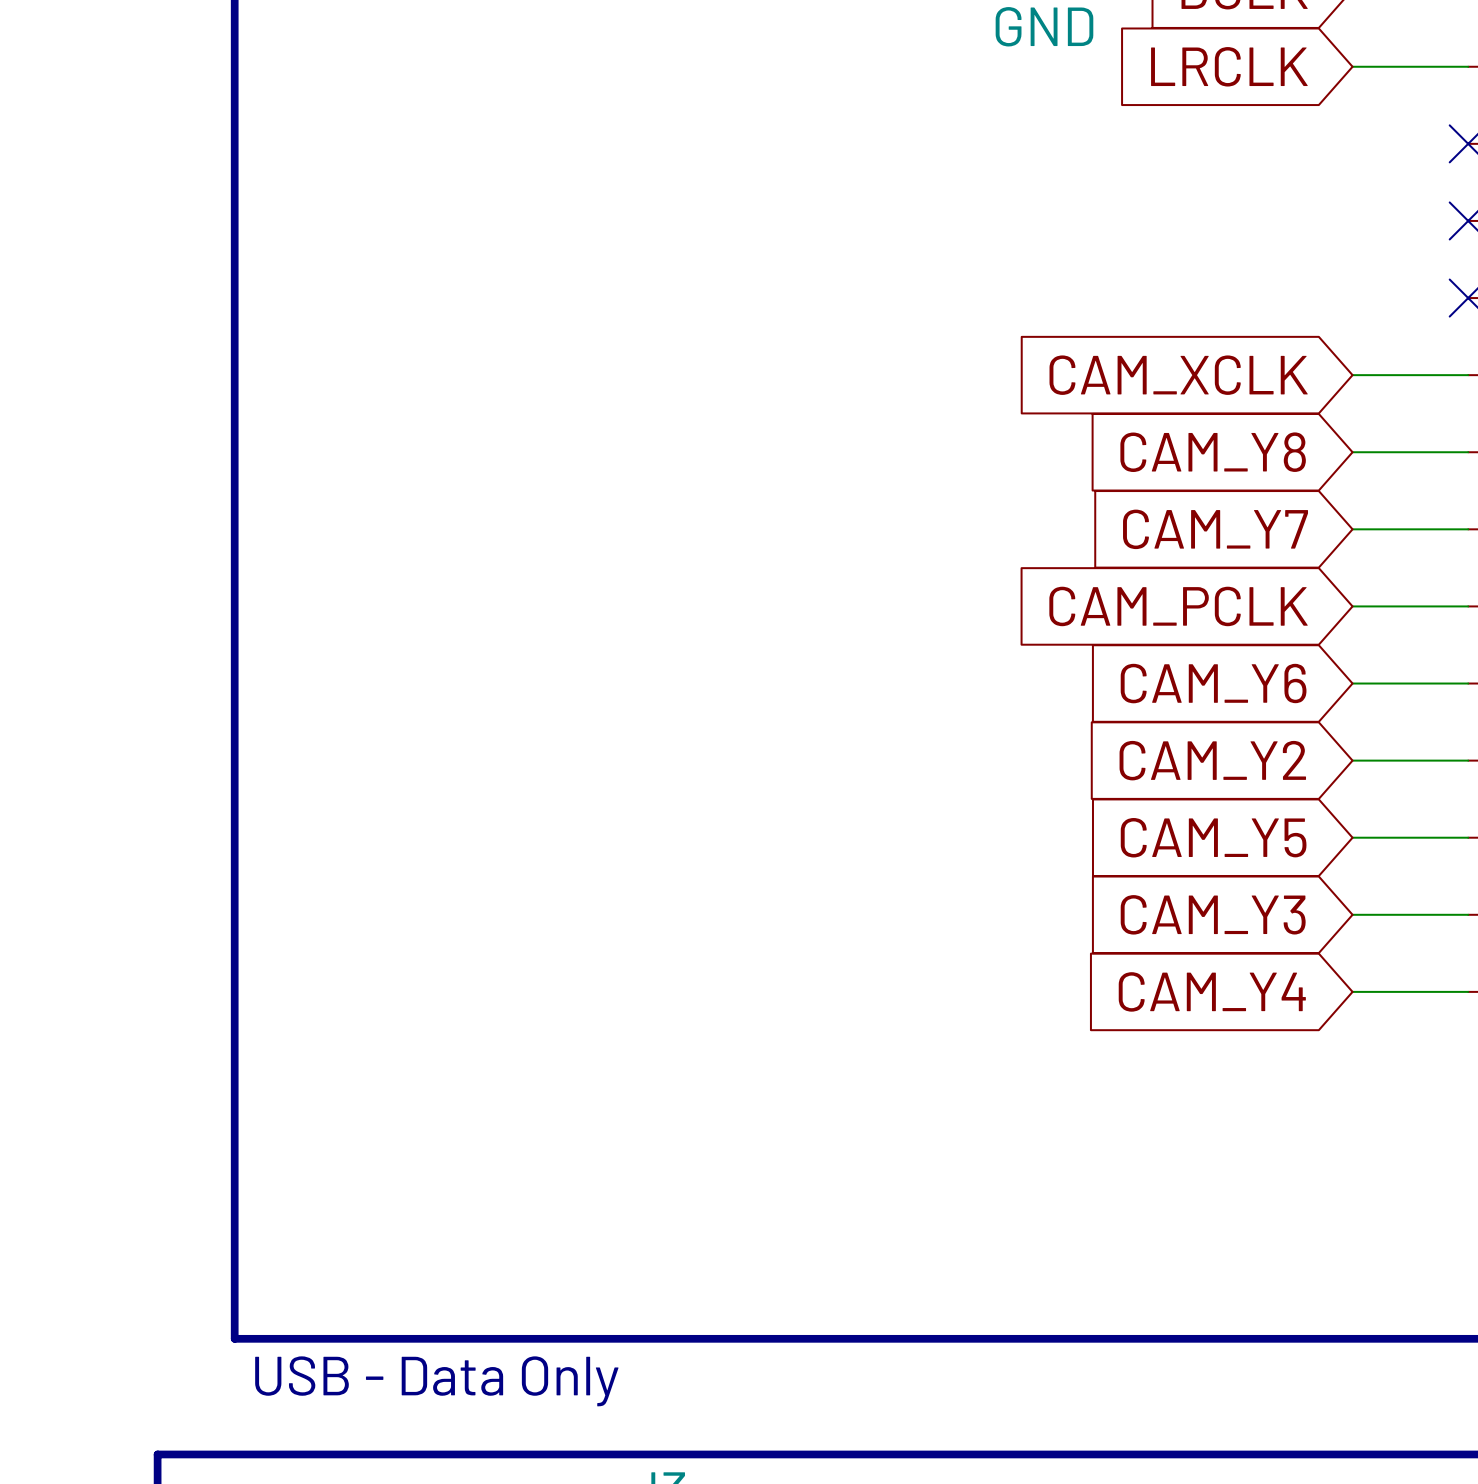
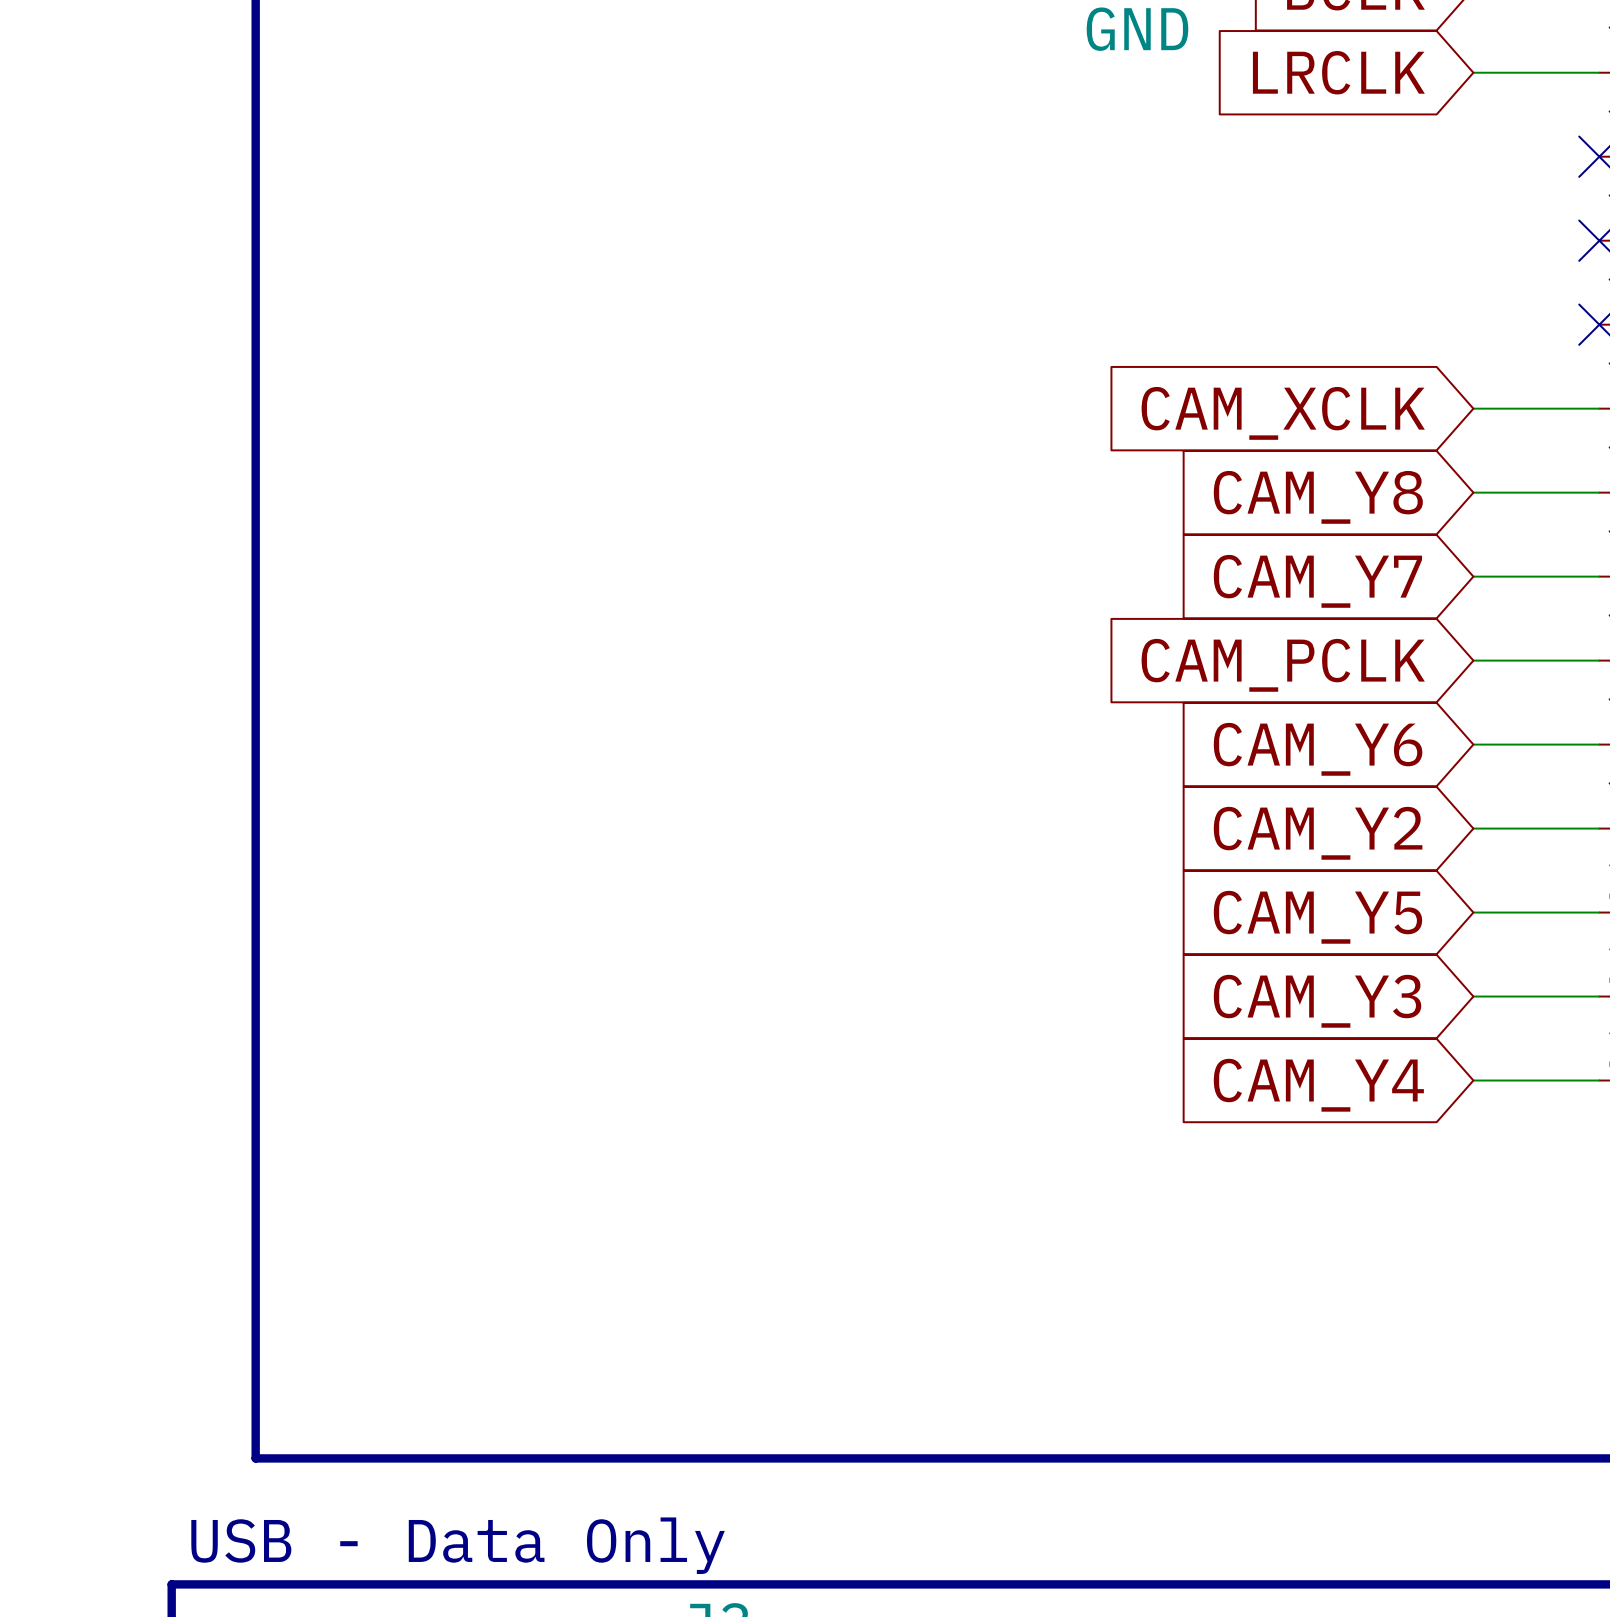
text position: USB - Data Only (436, 1381) -> USB - Data Only (458, 1545)

